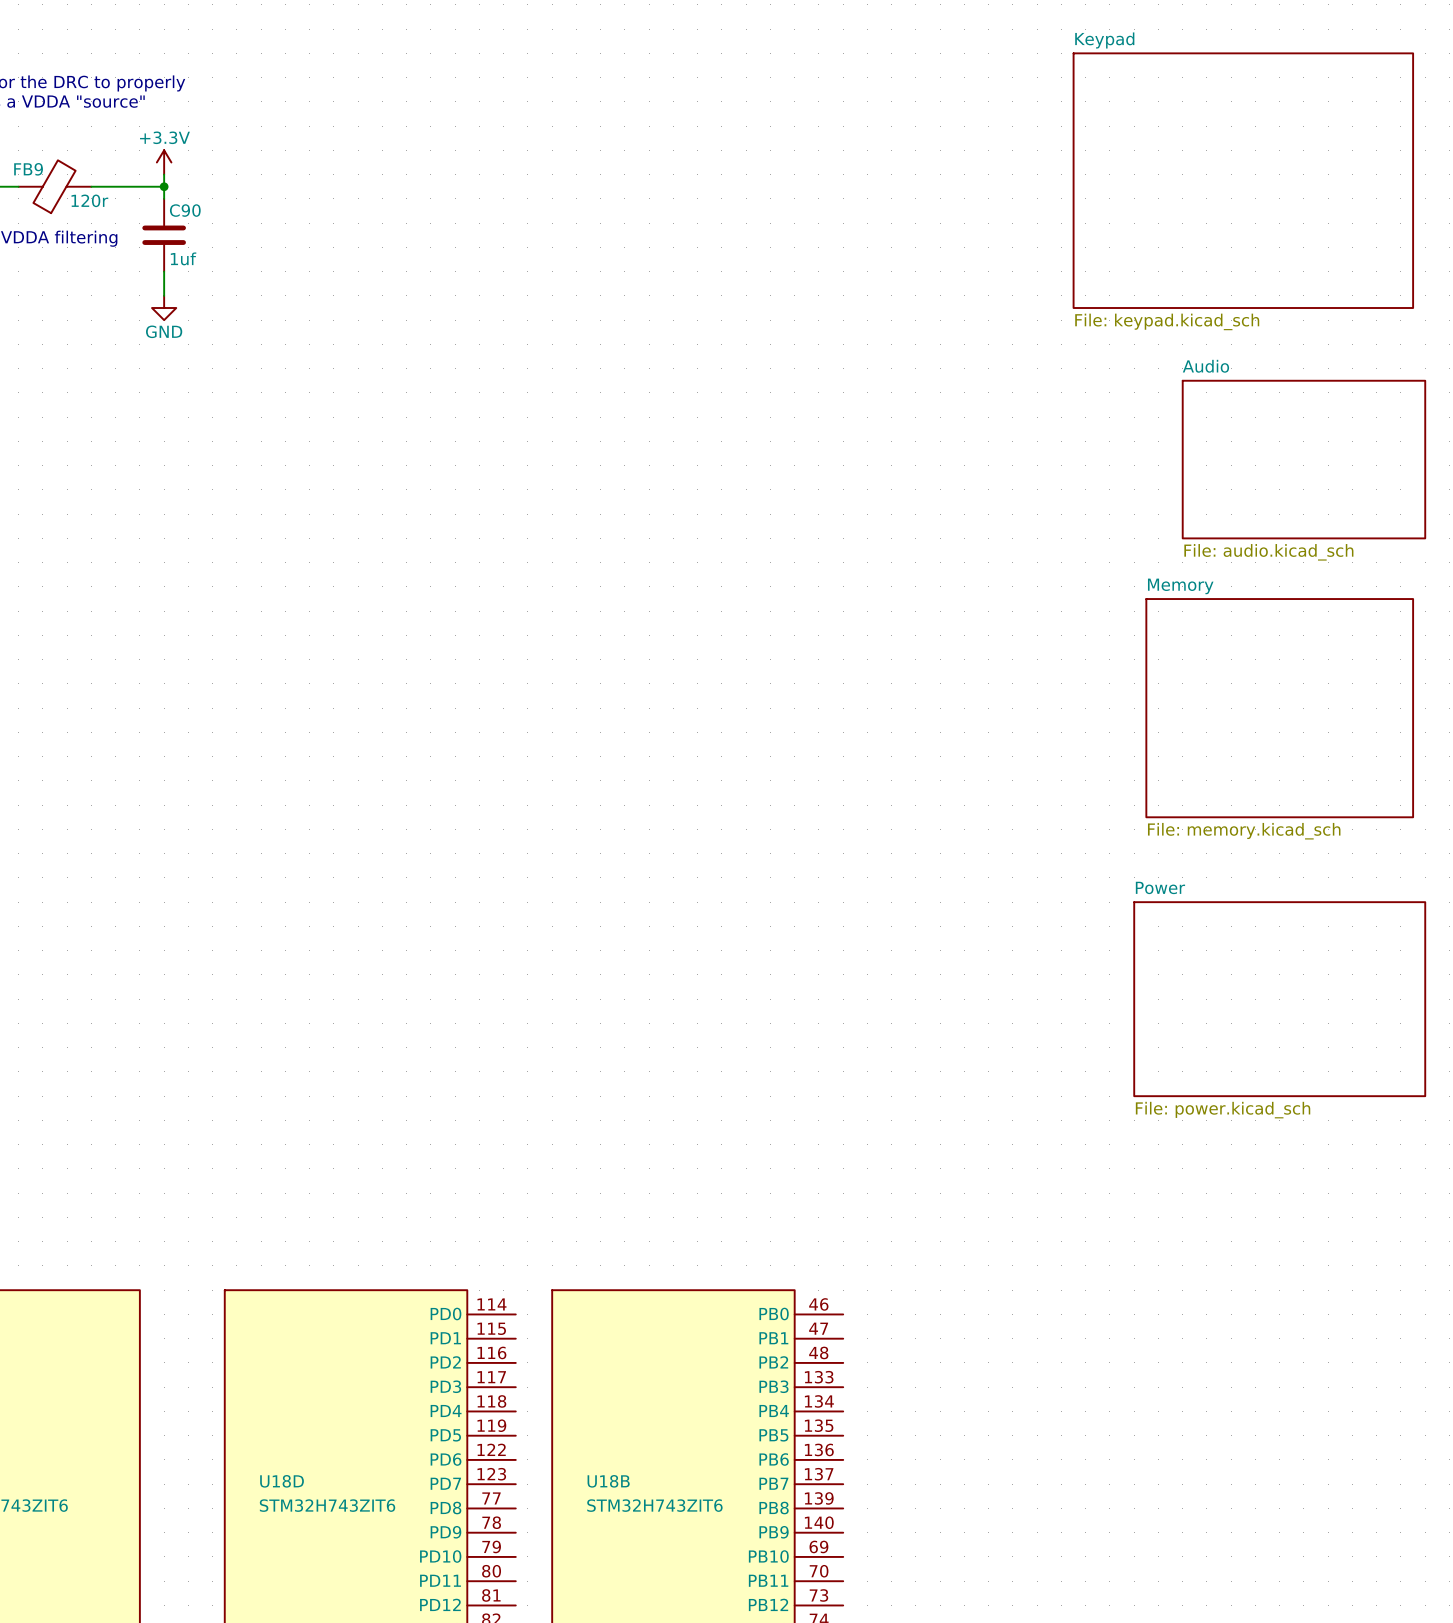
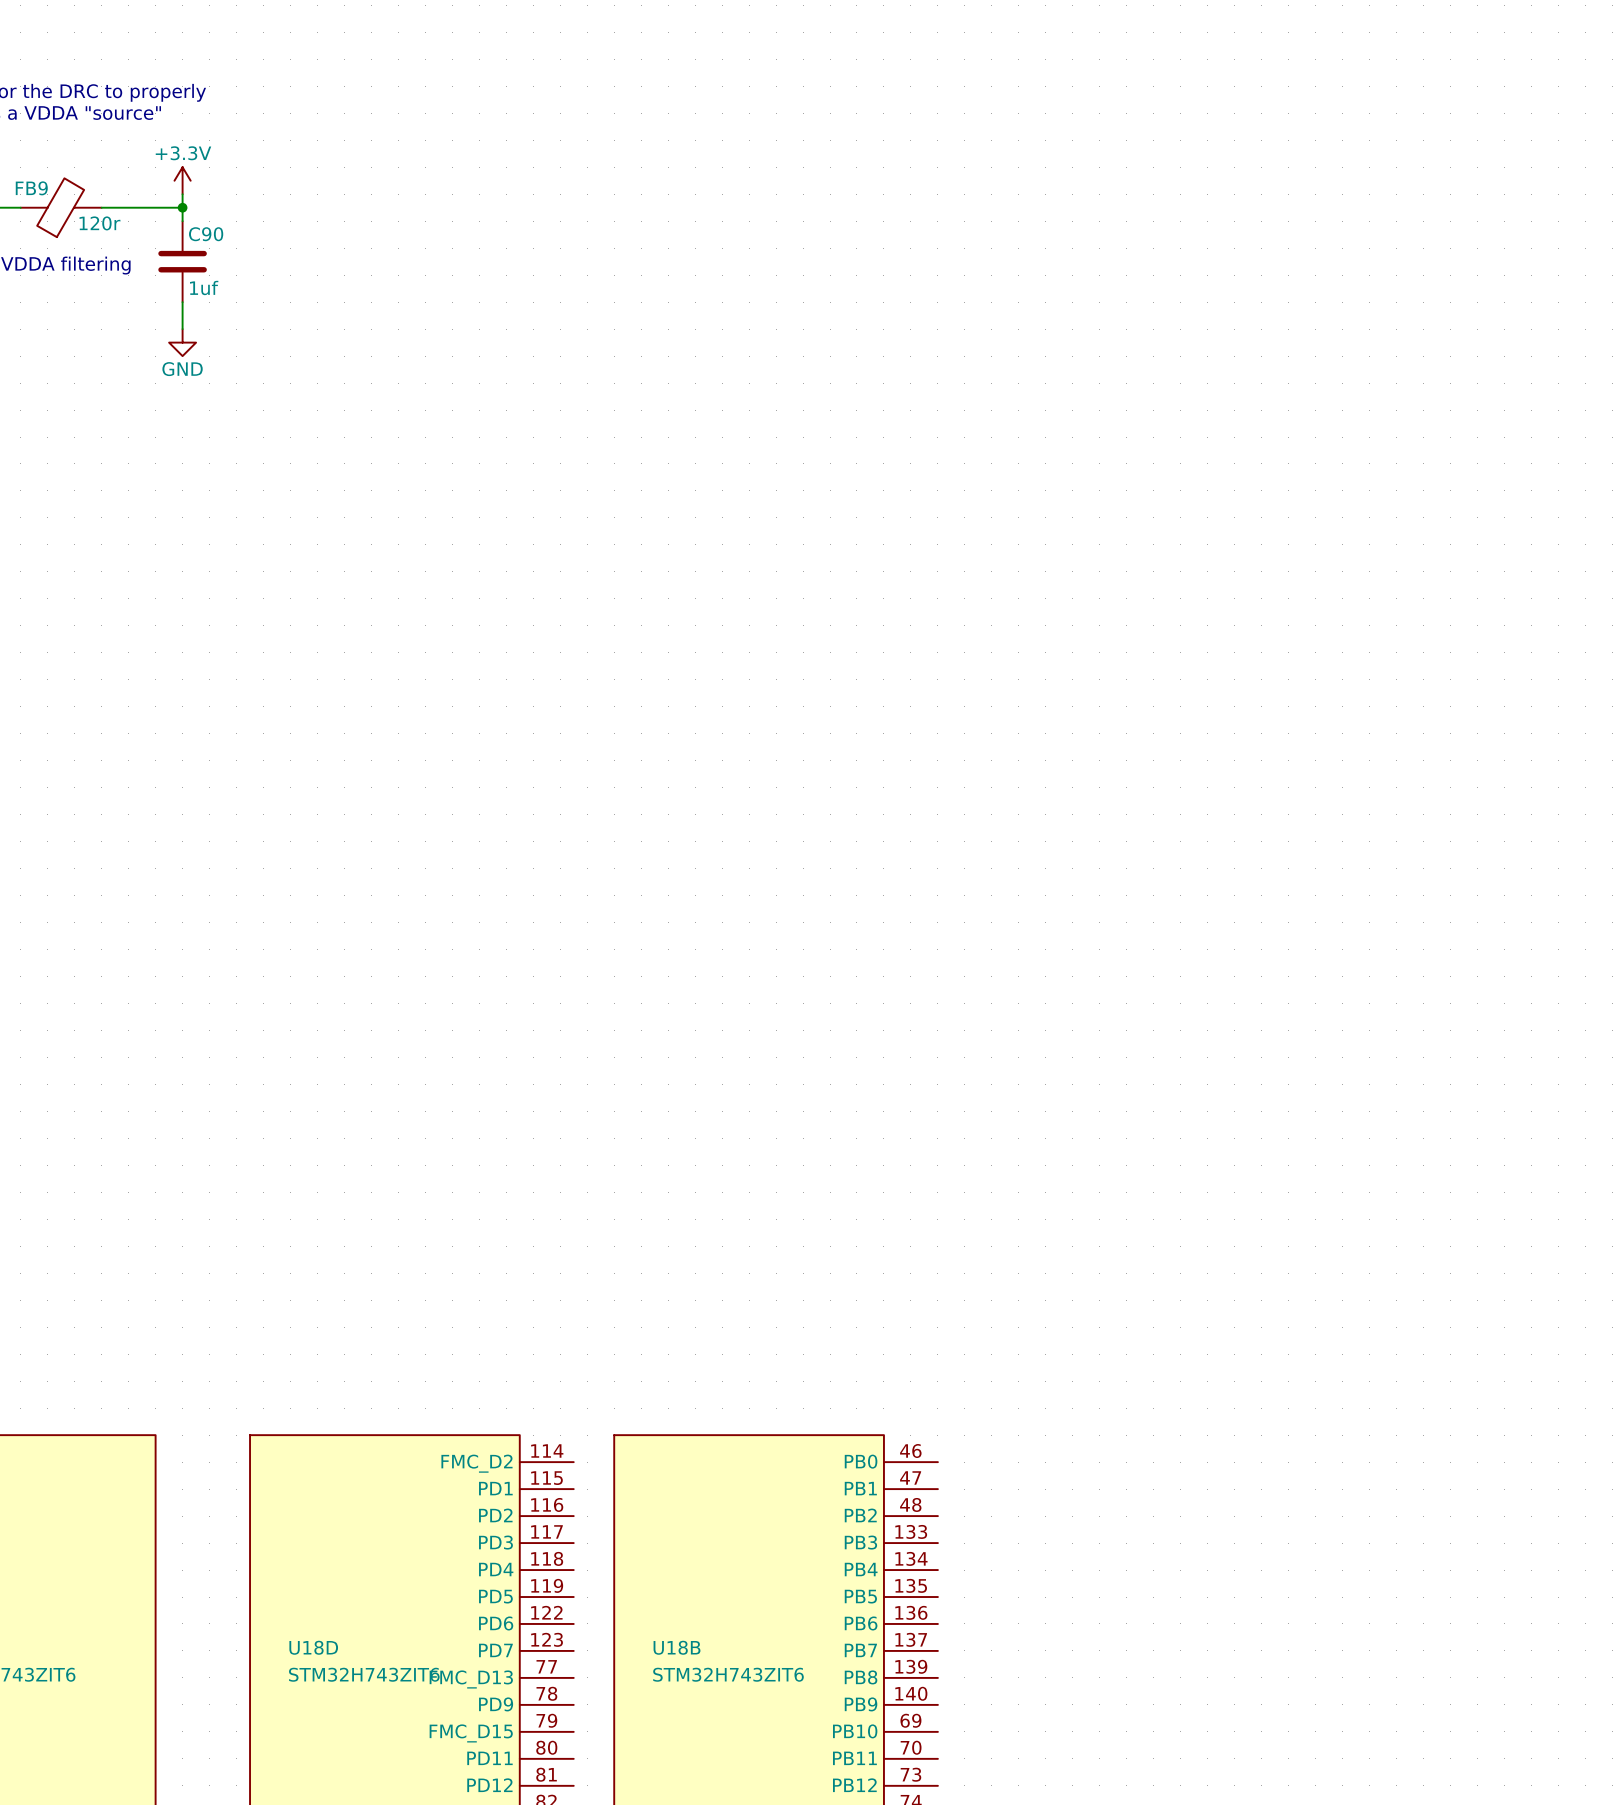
sheet Keypad: File: keypad.kicad_sch (1243, 180) -> none
sheet Audio: File: audio.kicad_sch (1303, 459) -> none
sheet Memory: File: memory.kicad_sch (1279, 708) -> none
sheet Power: File: power.kicad_sch (1279, 999) -> none
U18D pin name: PD0 (445, 1314) -> FMC_D2 (476, 1463)
U18D pin name: PD8 (445, 1508) -> FMC_D13 (471, 1679)
U18D pin name: PD10 (440, 1556) -> FMC_D15 (471, 1733)

